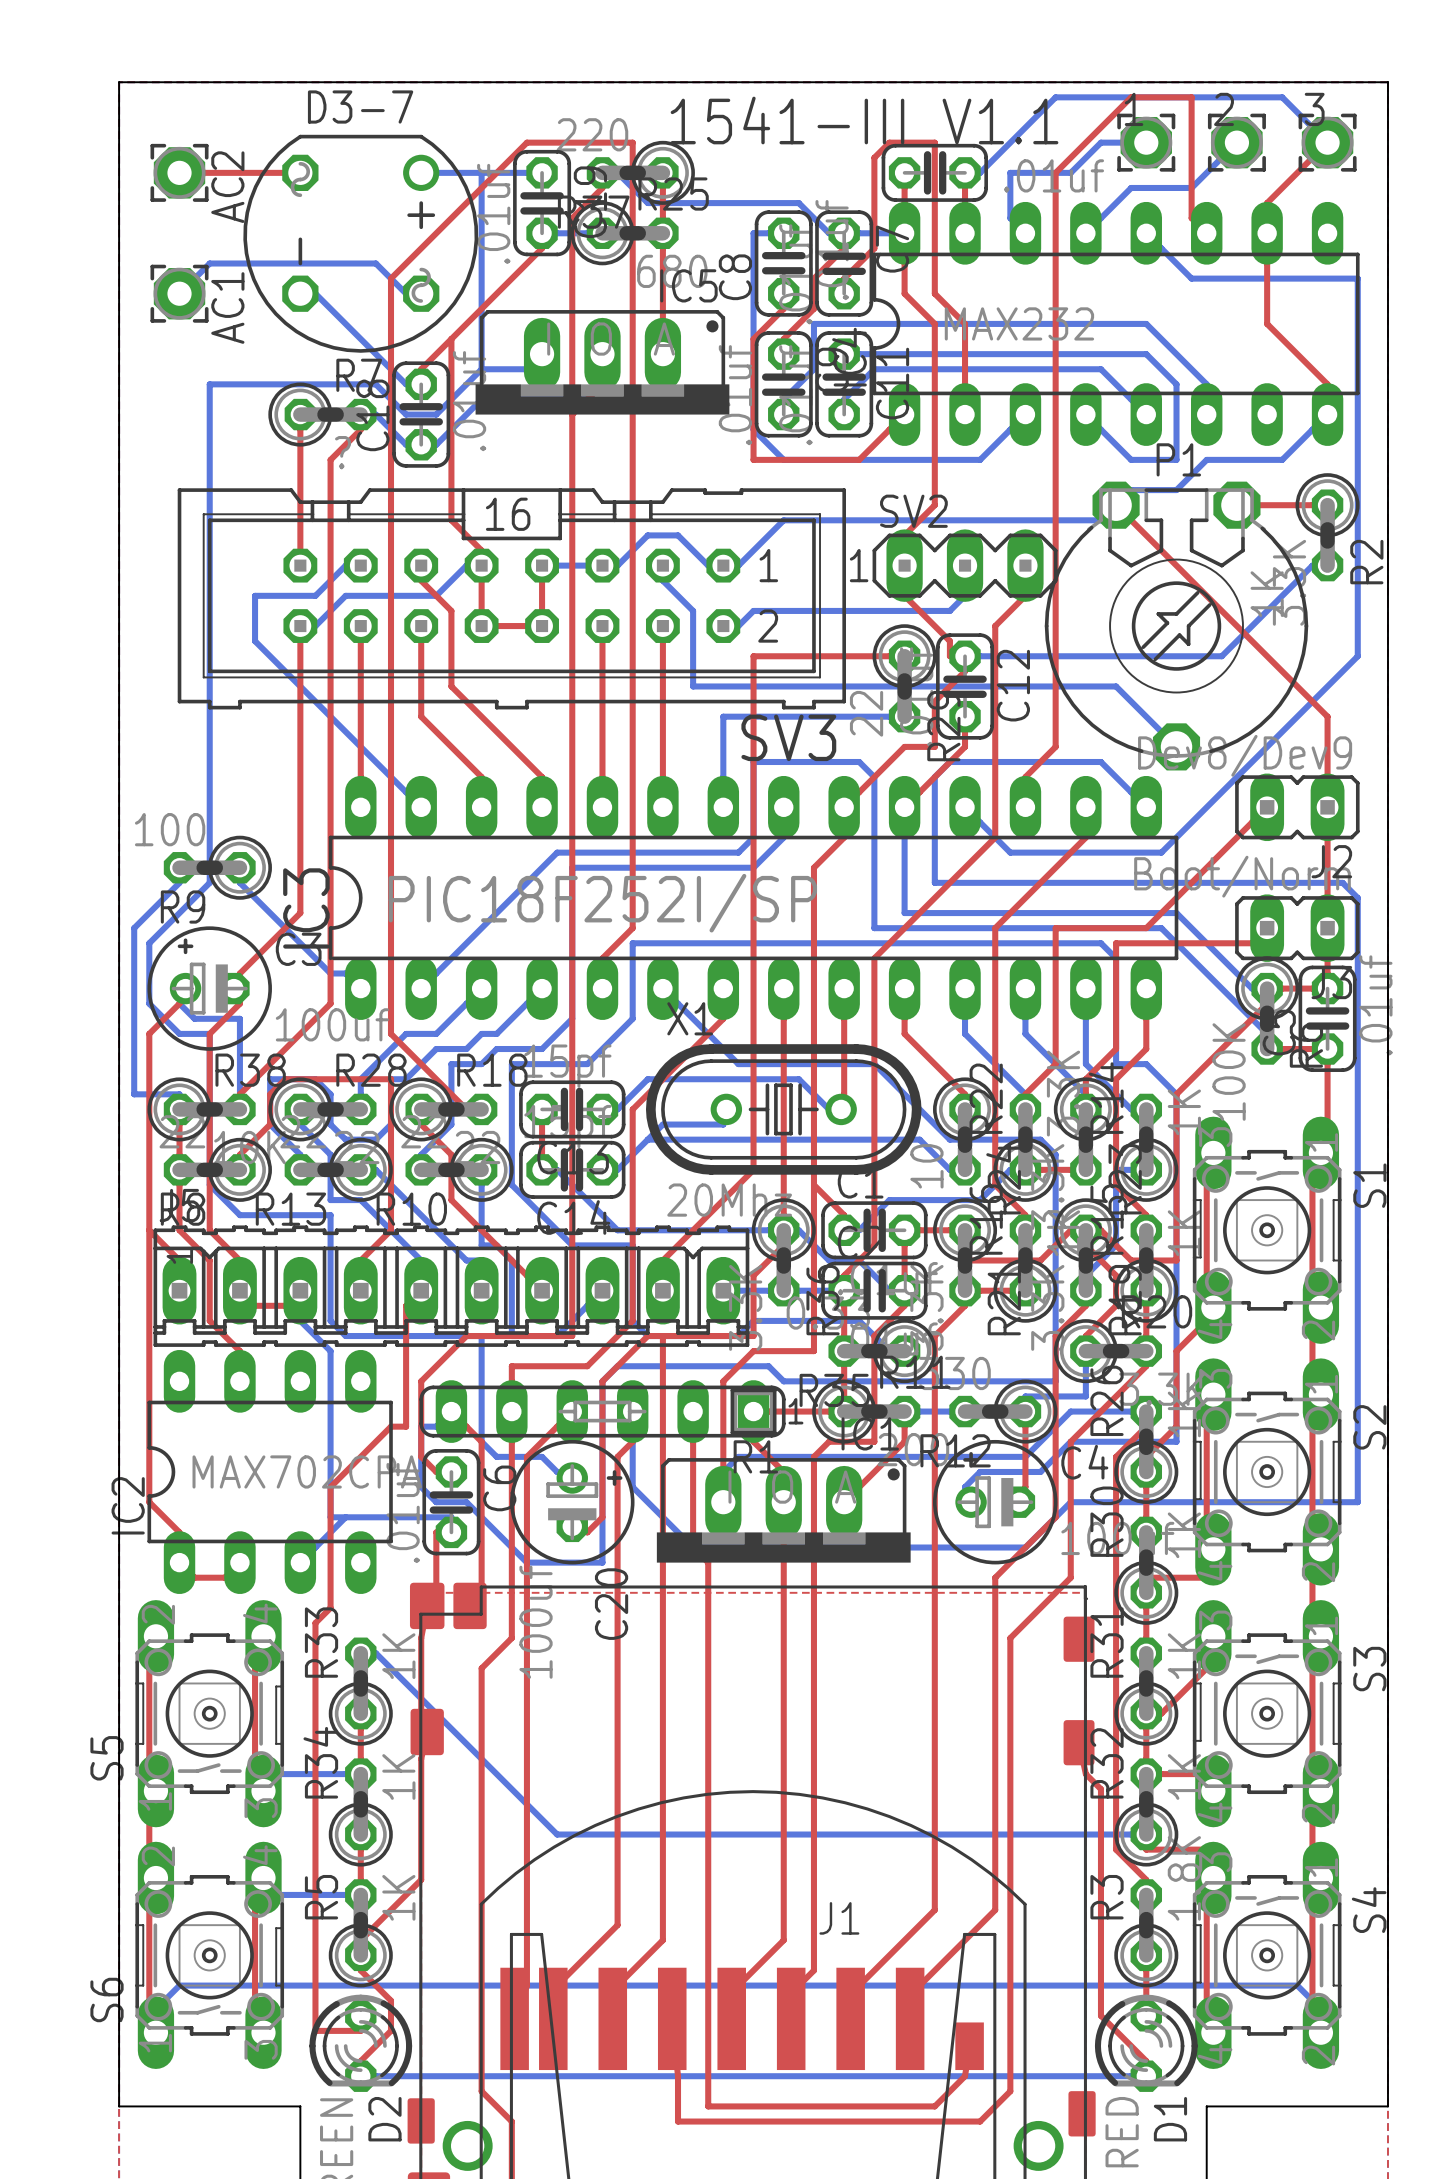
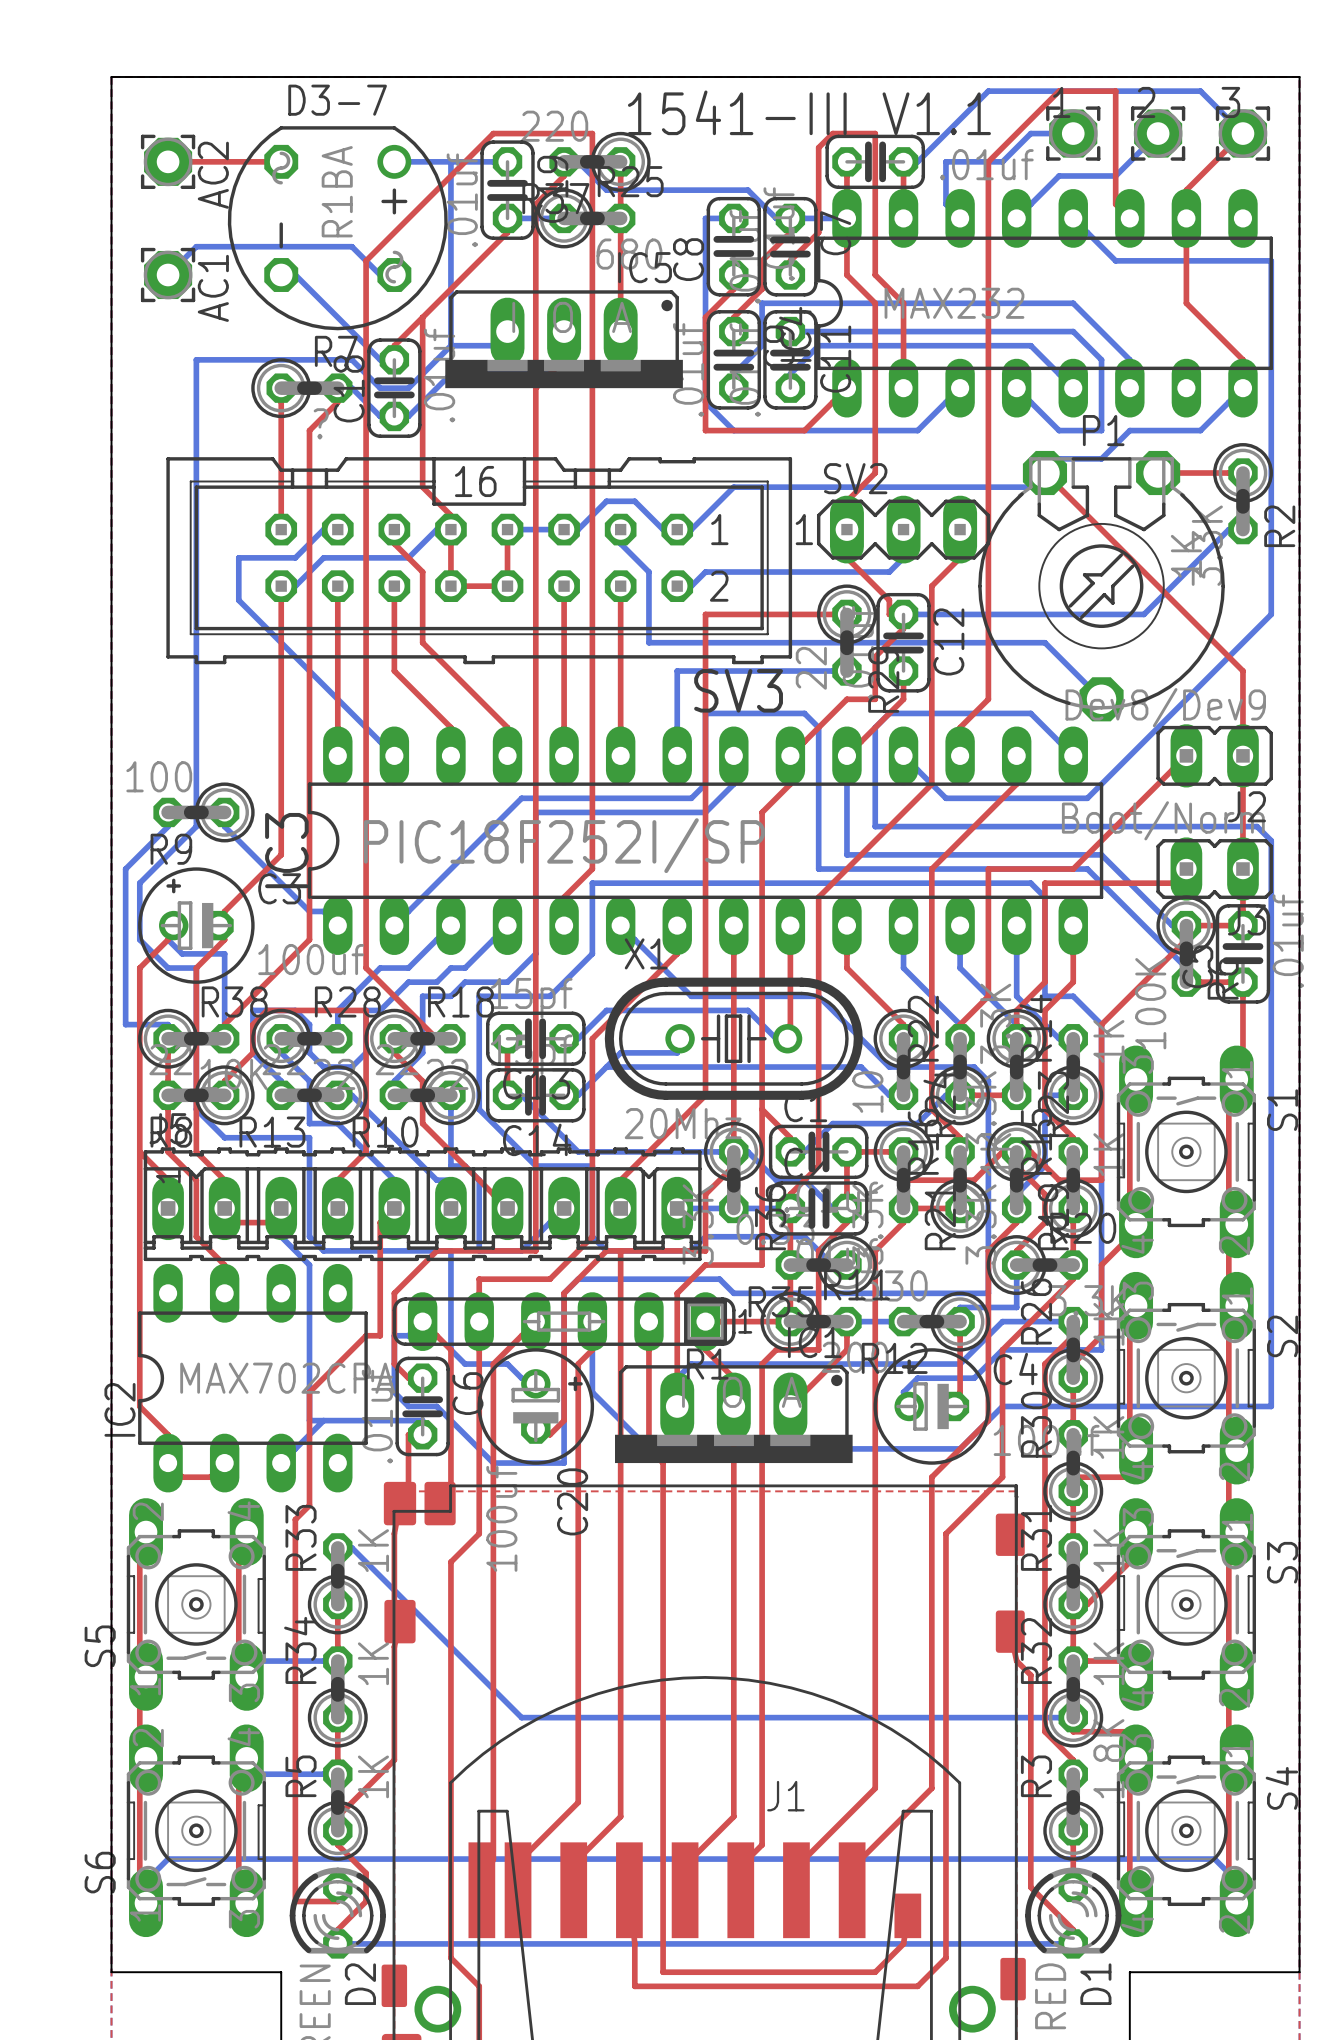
D3-7 value: none -> R1BA (337, 191)

